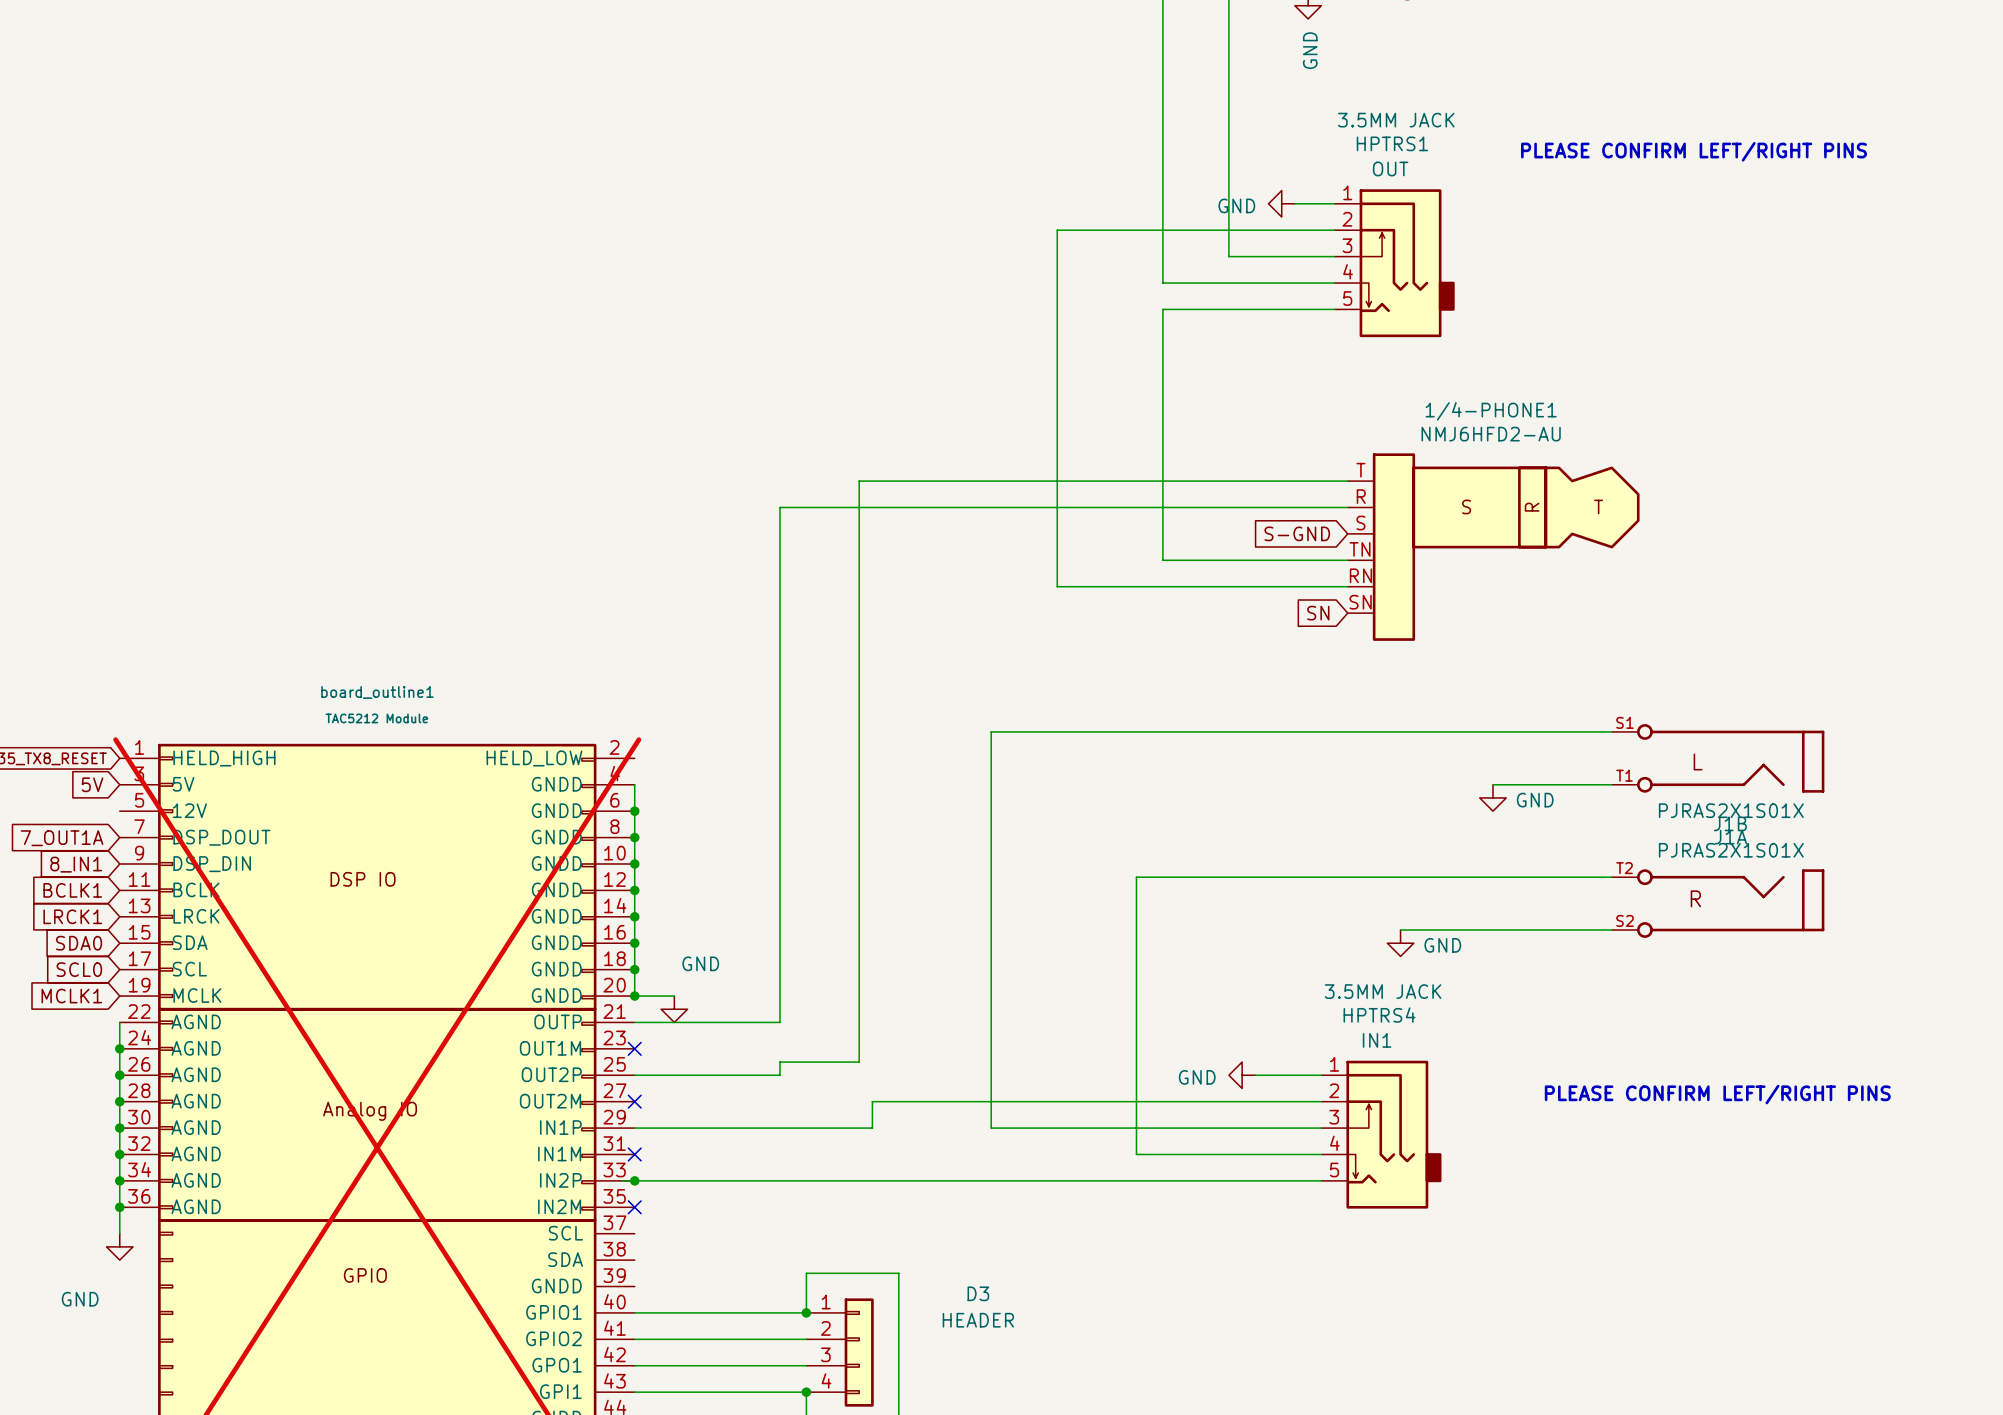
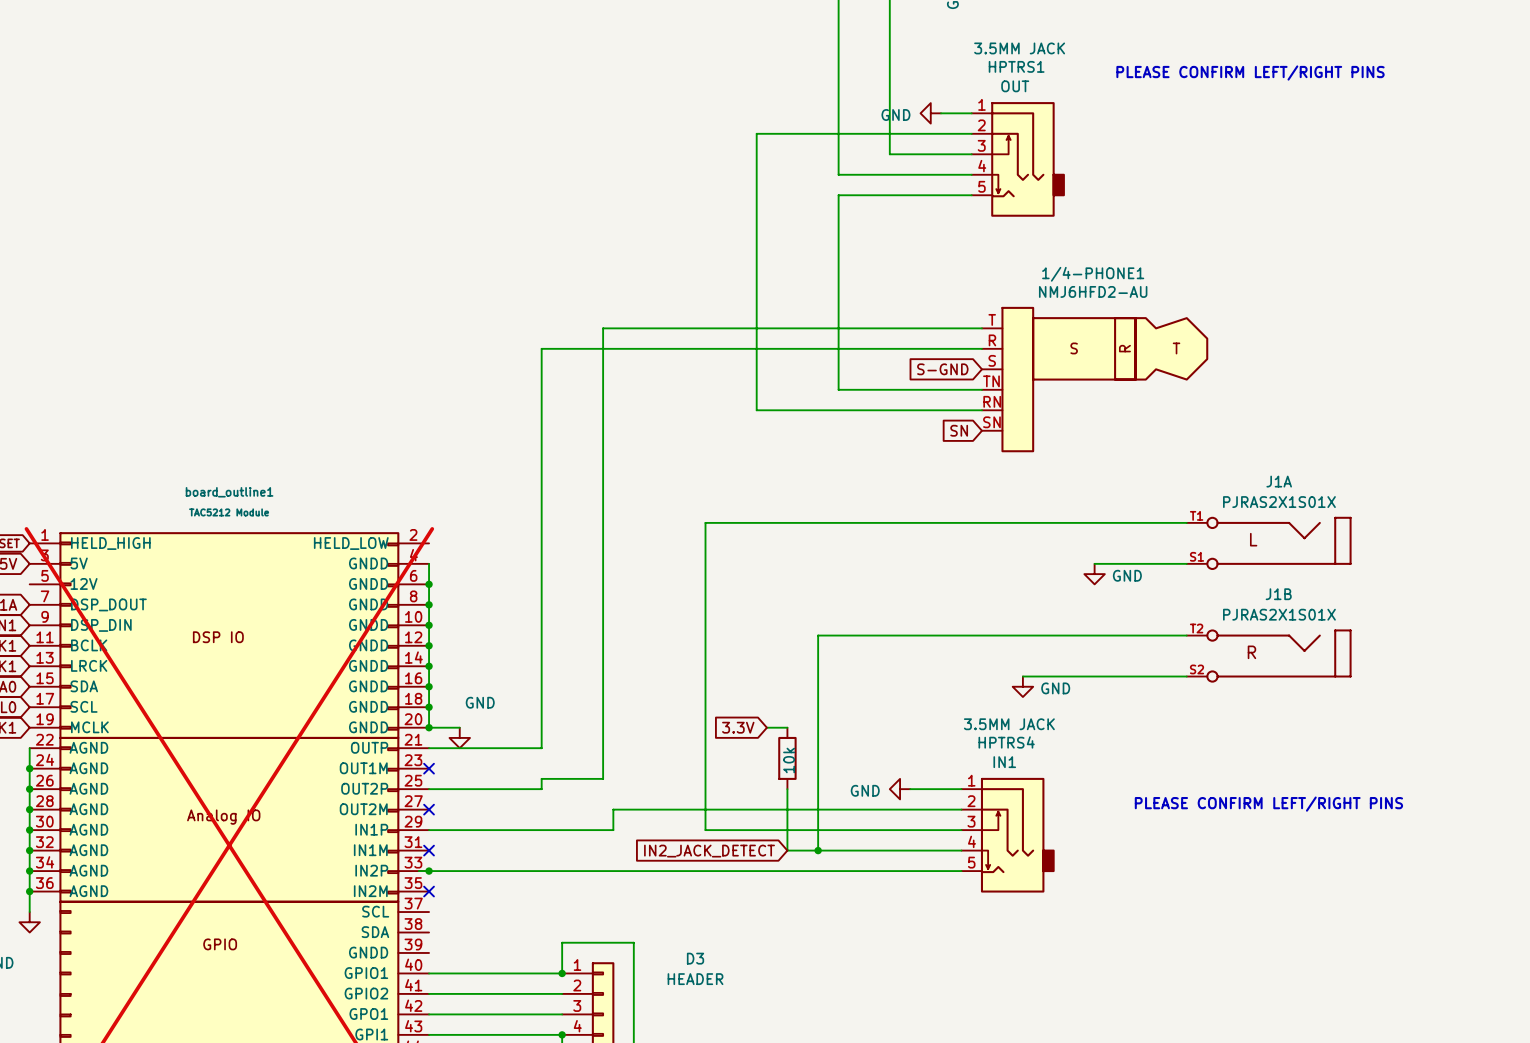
J1A flip: as is (1730, 758) -> up-down (1278, 543)
global label: none -> 3.3V (738, 727)
wire: none -> (766, 727) (787, 727)
part: none -> 10k (787, 758)
wire: none -> (787, 789) (787, 850) (818, 850)
junction: none -> (818, 850)
global label: none -> IN2_JACK_DETECT (709, 851)

